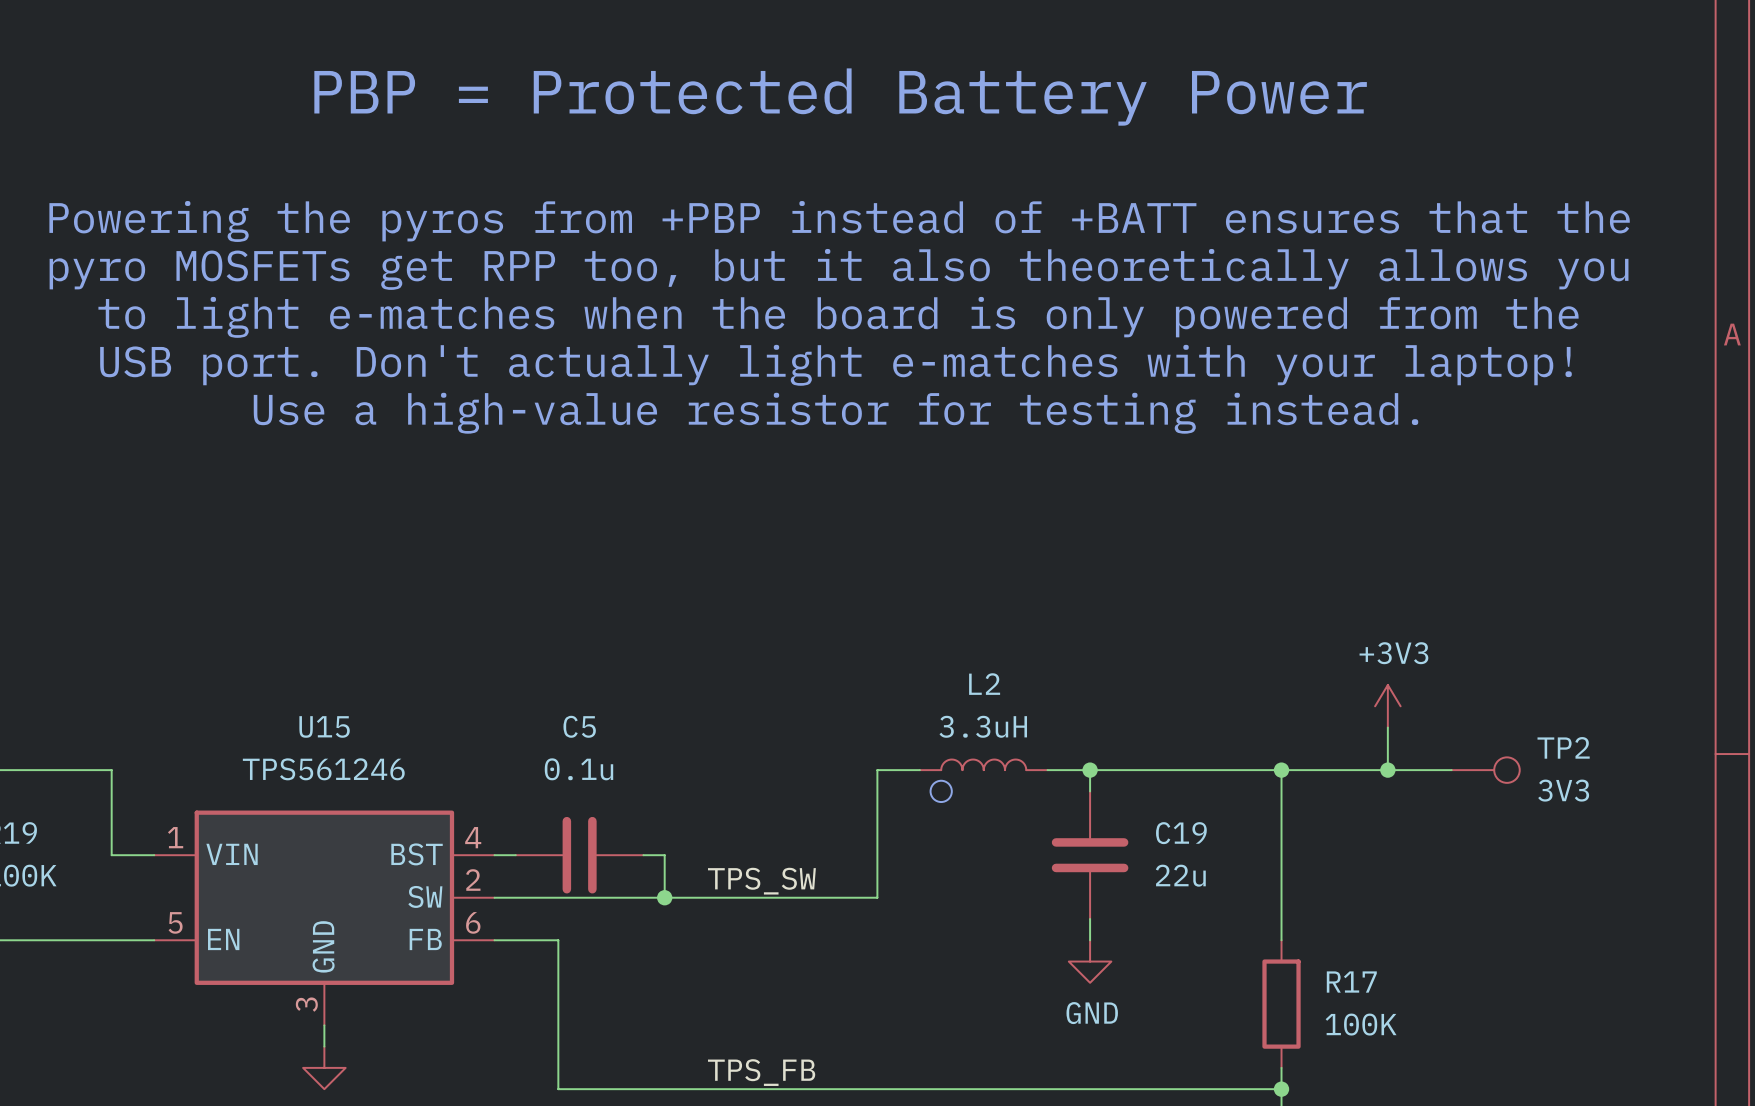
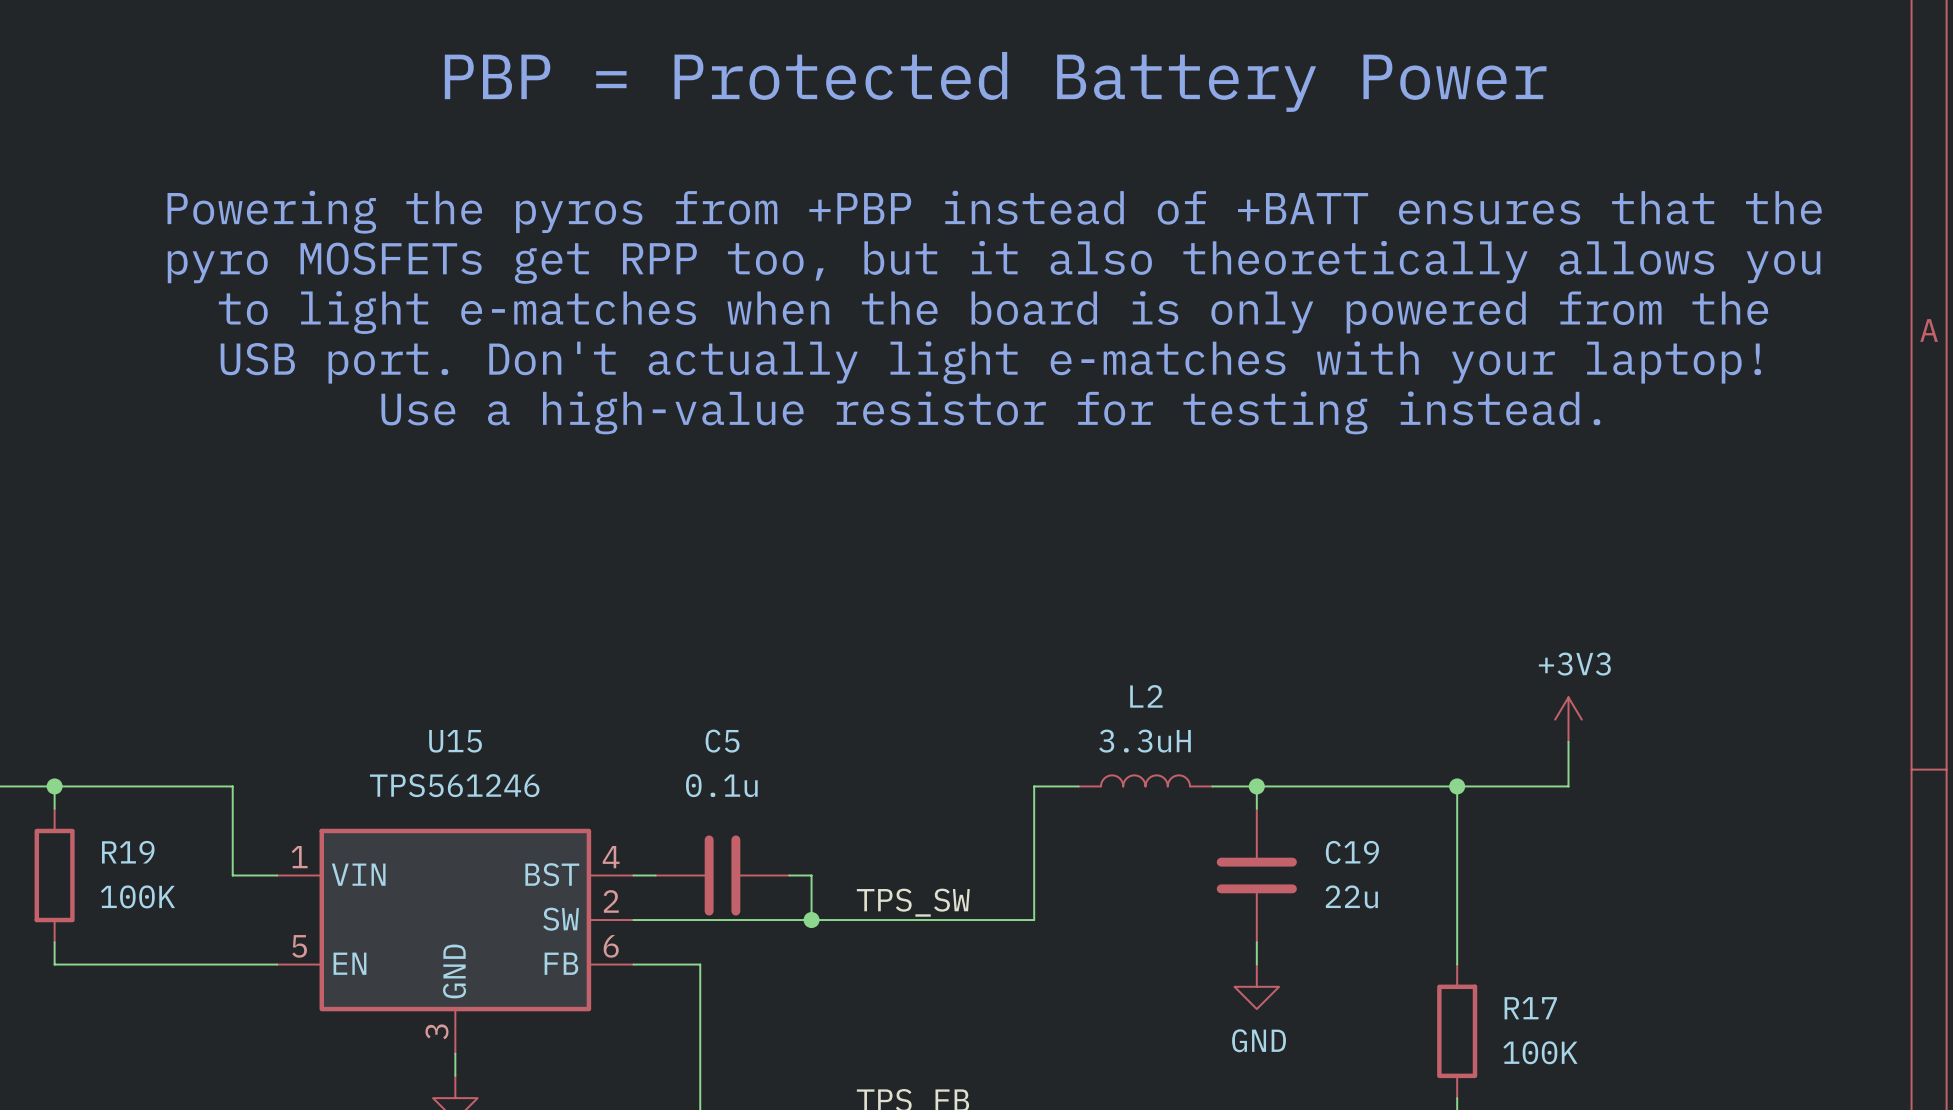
wire: (1387, 770) (1451, 770) -> none
junction: (1387, 770) -> none
TP2: 3V3 (1485, 770) -> none
drawing: [930, 780, 952, 803] -> none

